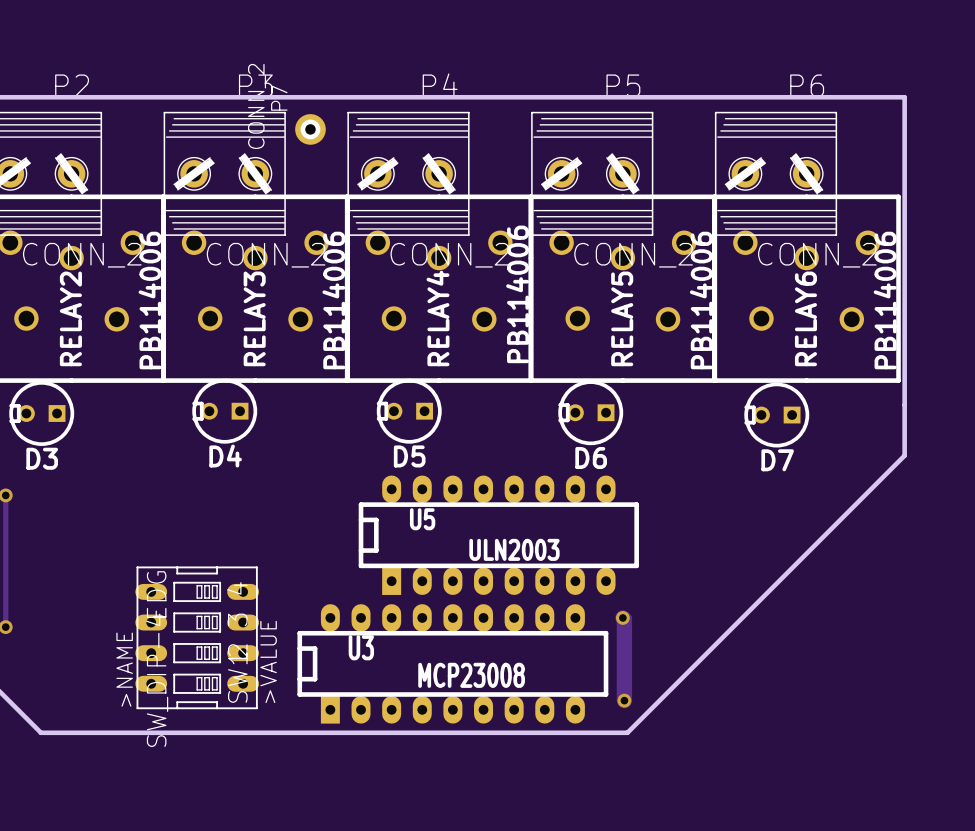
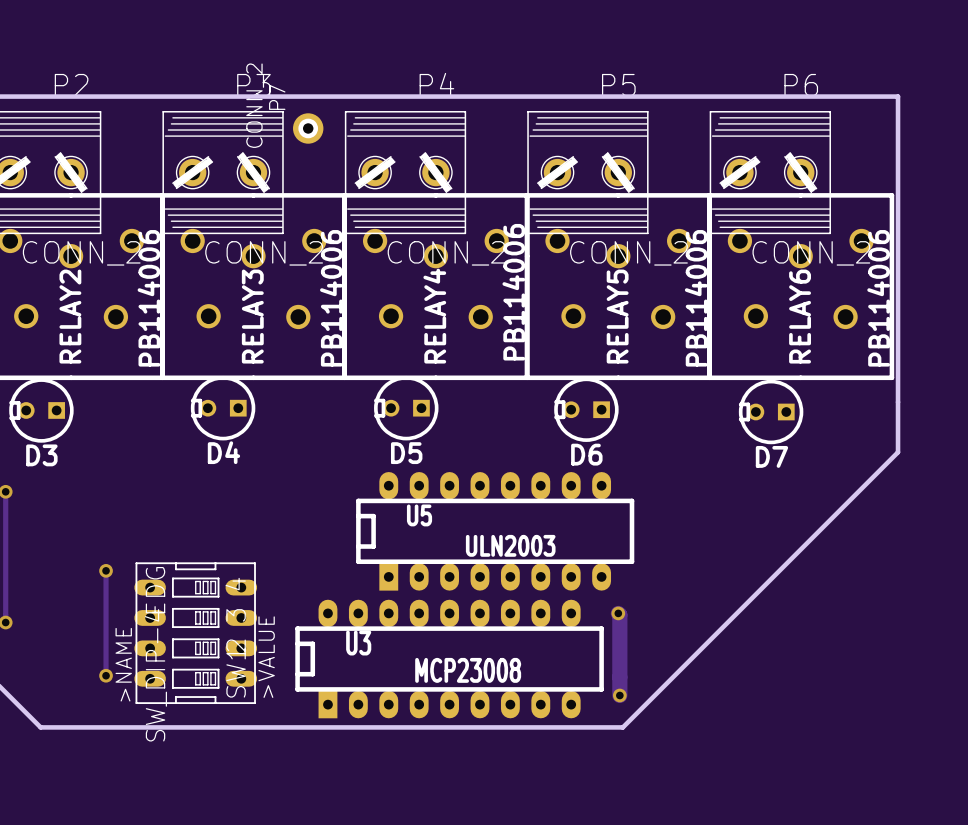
track: none -> (106, 570) (106, 675)
via: none -> (106, 570)
via: none -> (106, 675)

